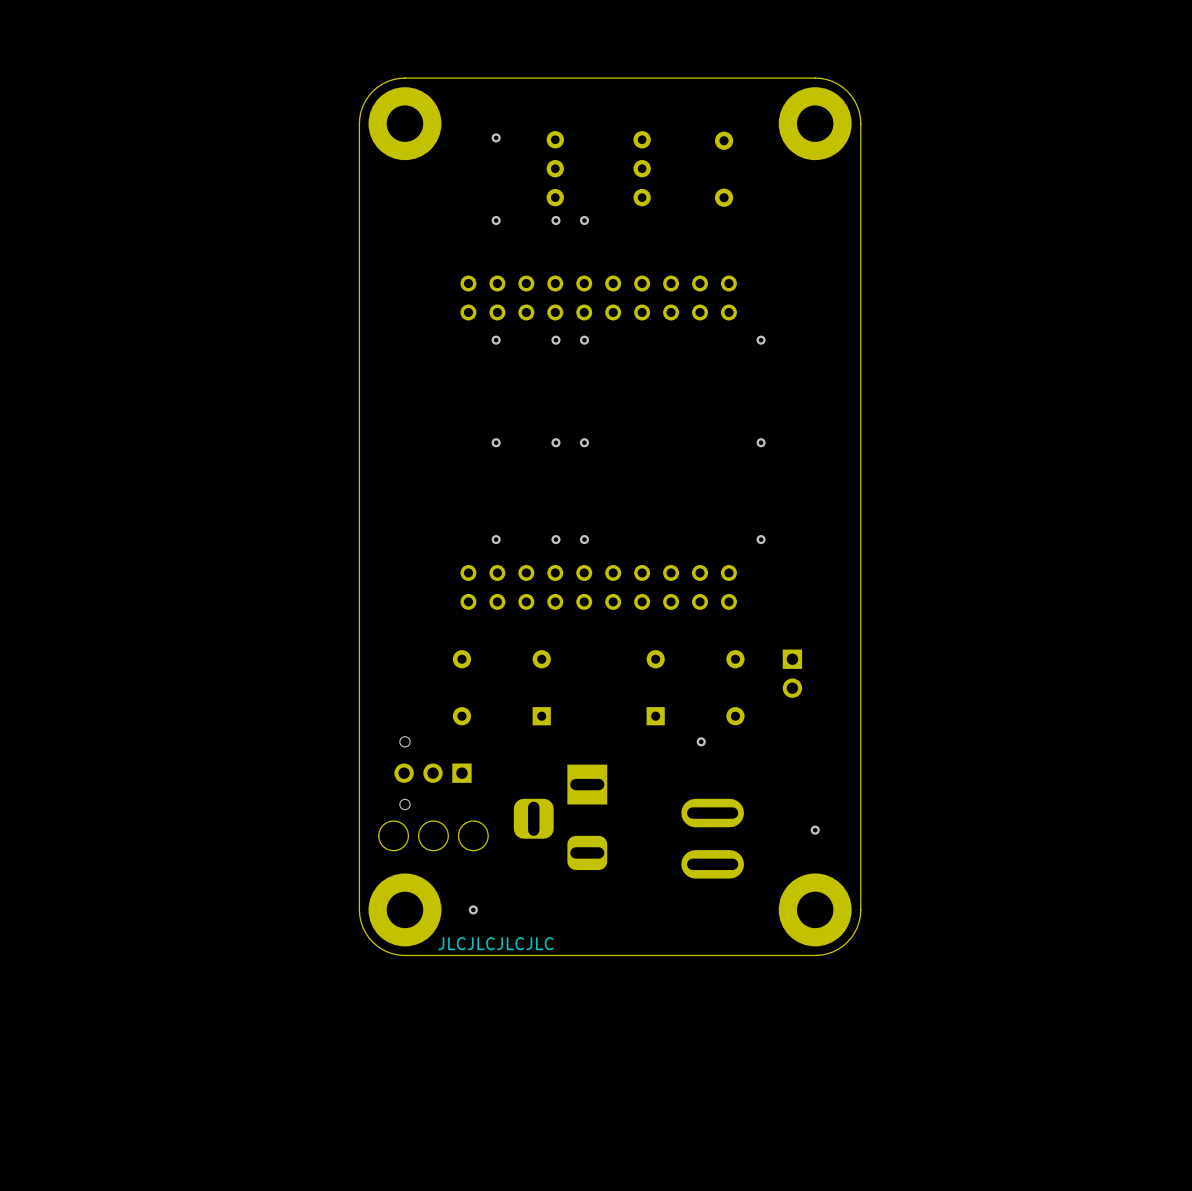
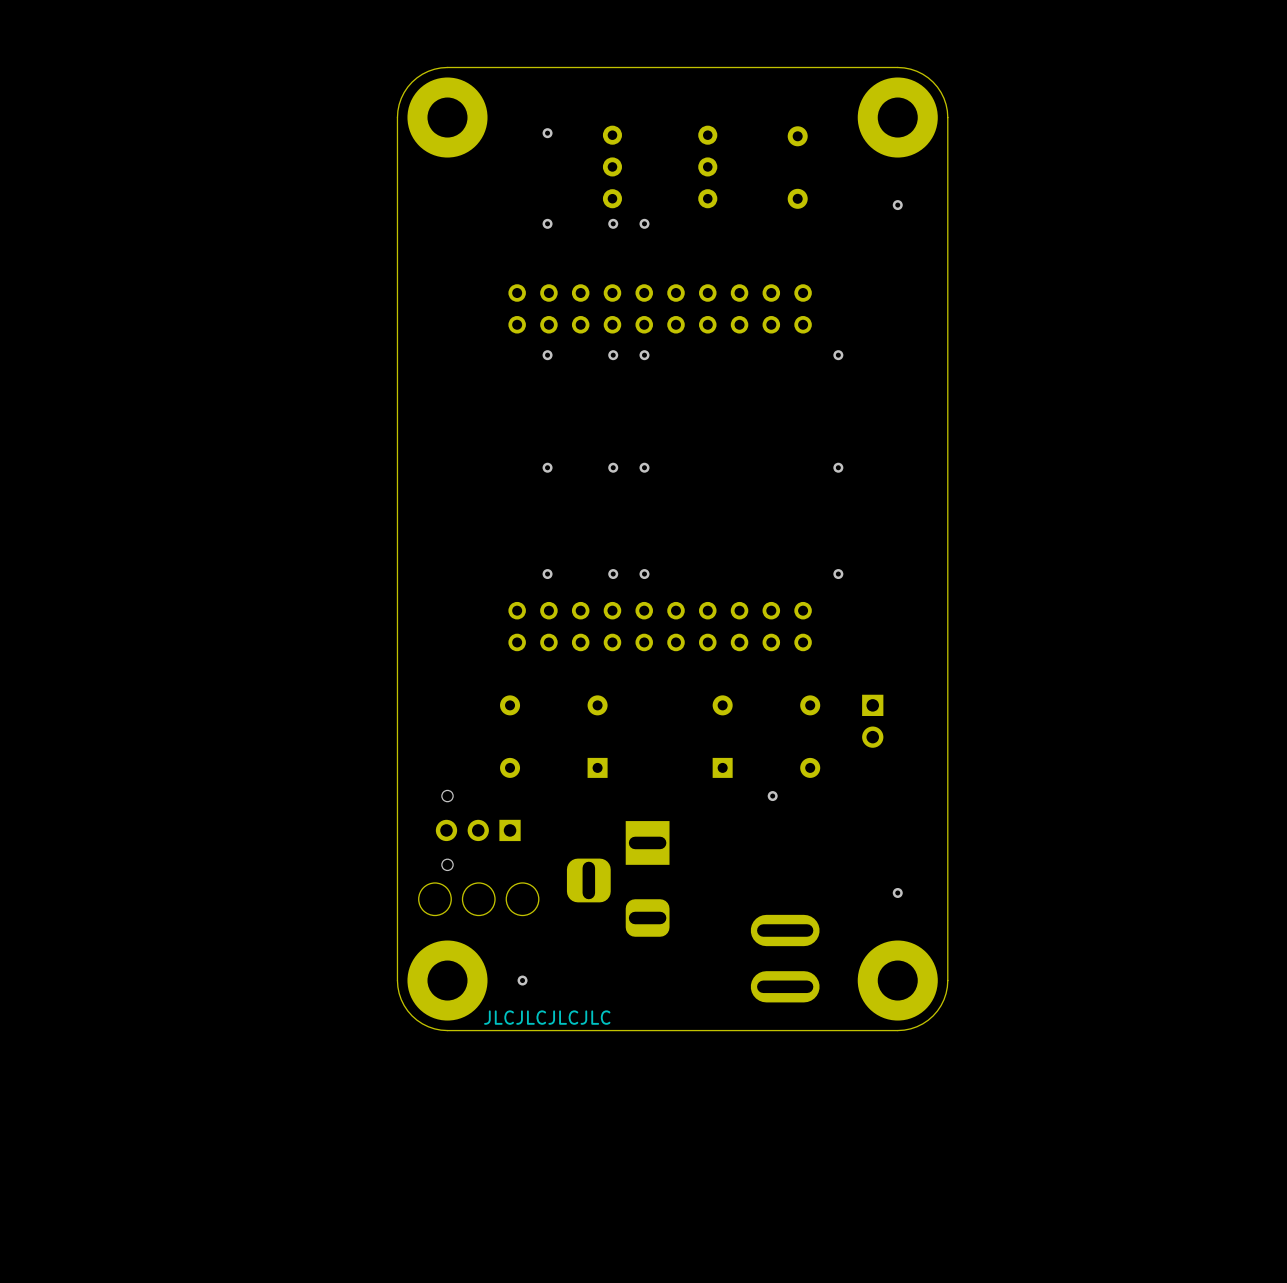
via: none -> (897, 205)
part position: (712, 838) -> (785, 958)

